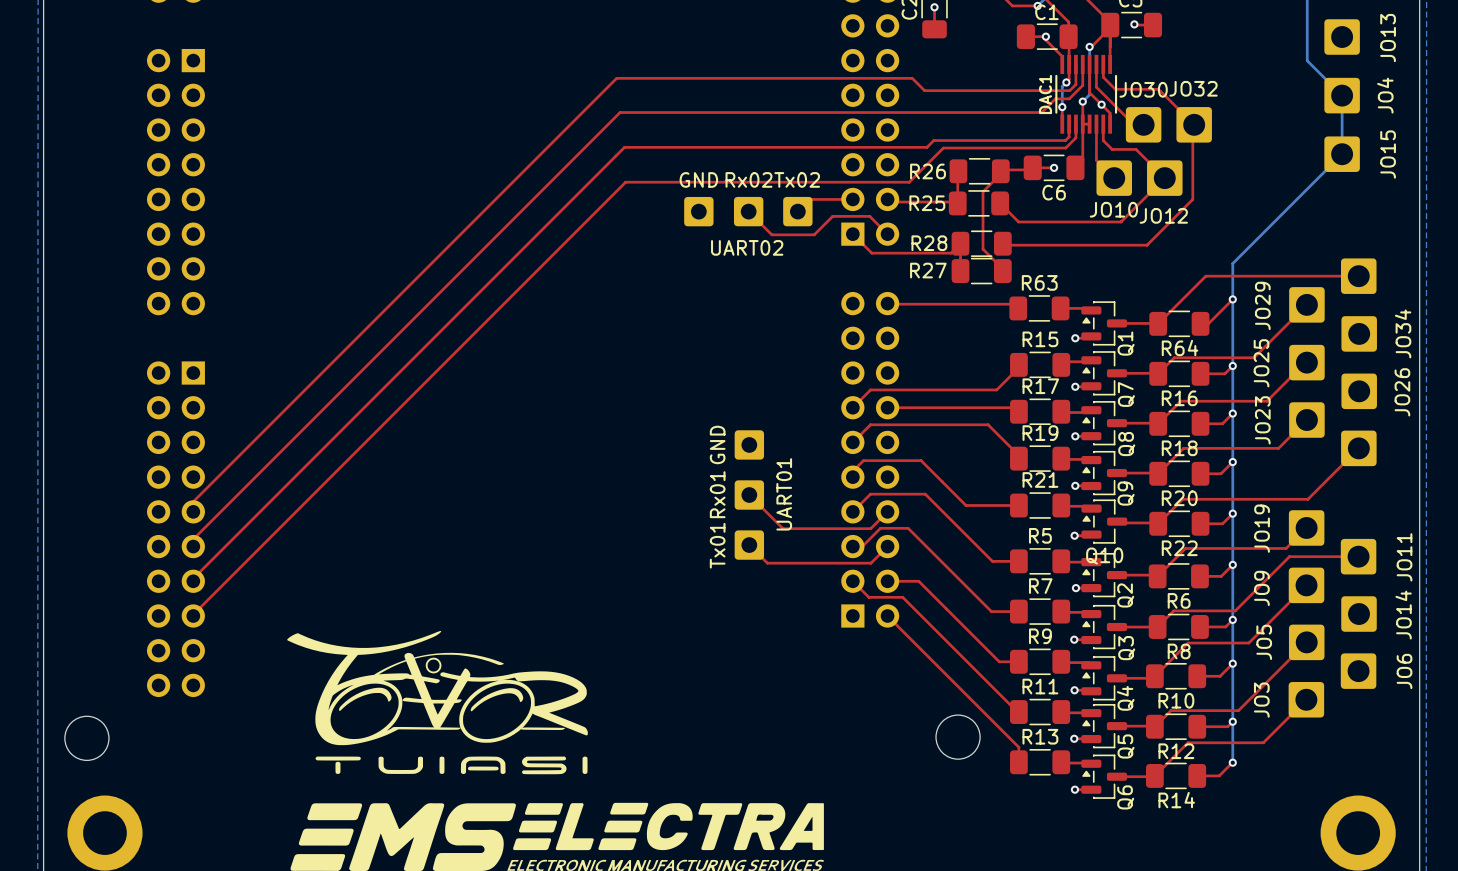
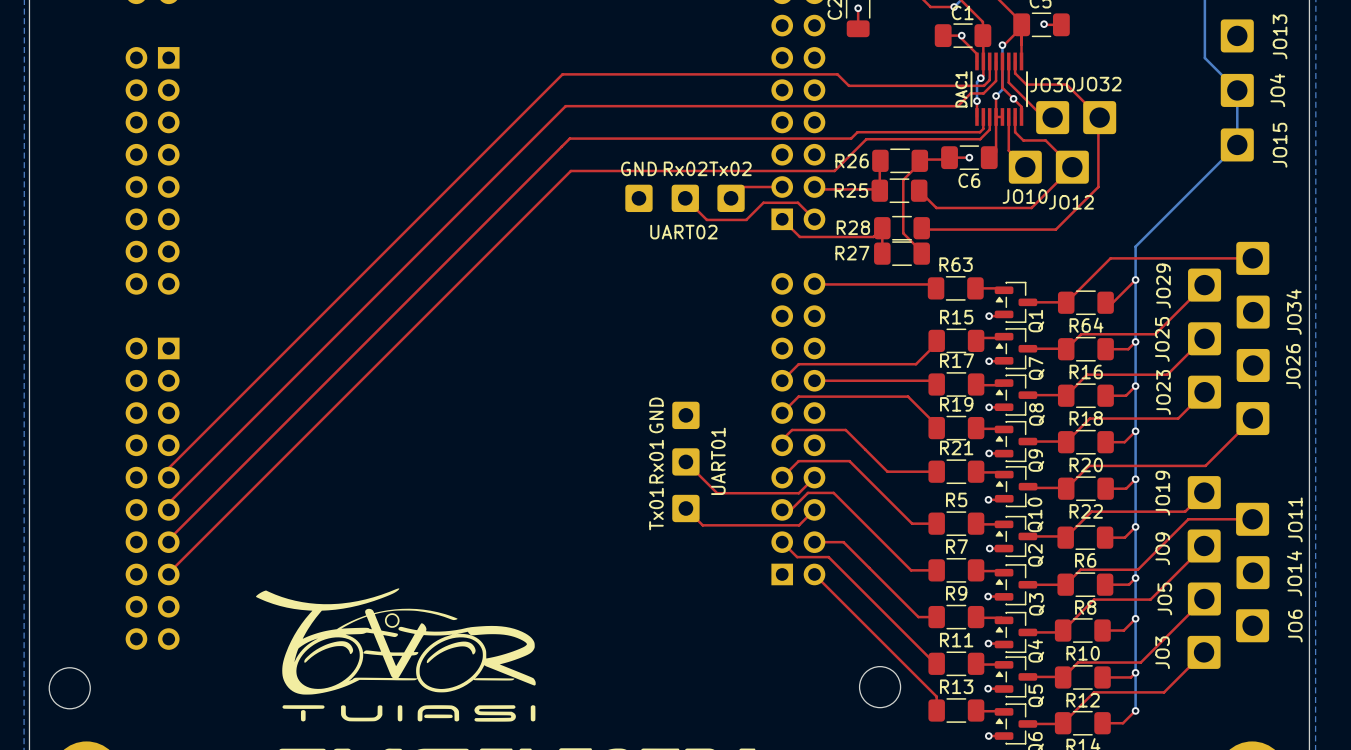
Q10 name rotation: 0° (1104, 556) -> 90° counterclockwise (1035, 514)

